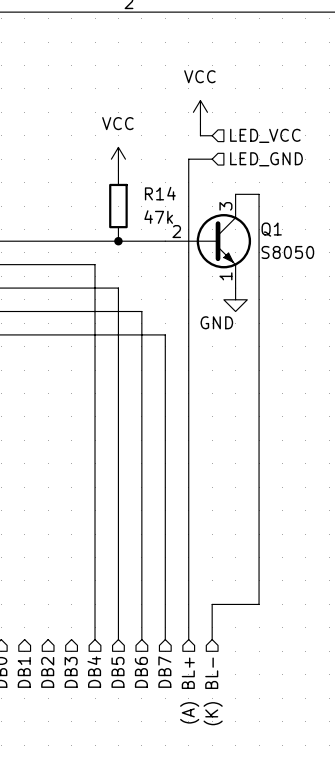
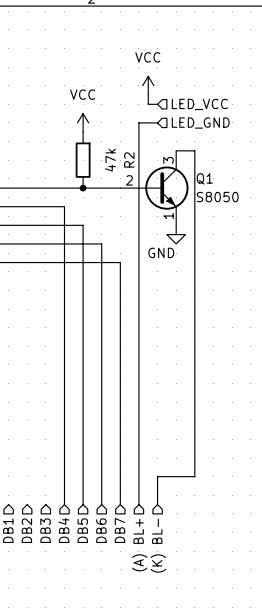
R14 name: R14 (160, 193) -> R2 (129, 159)
R14 value rotation: 0° (158, 217) -> 90° counterclockwise (110, 160)

